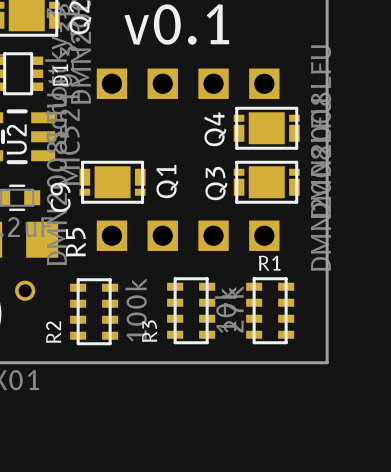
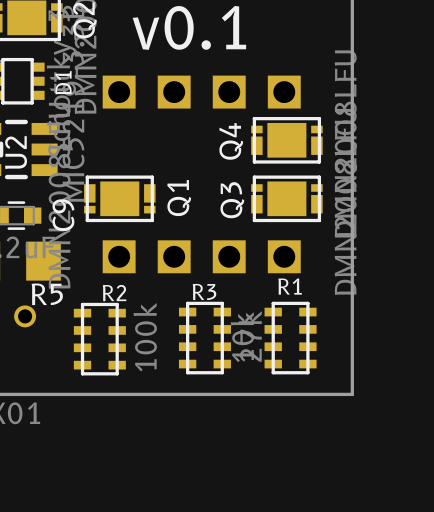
R5 name rotation: 0° (75, 242) -> 90° clockwise (47, 294)
R3 name rotation: 0° (149, 331) -> 90° clockwise (204, 291)
R3 name position: R3 (149, 331) -> R3 (204, 291)
R2 name rotation: 0° (53, 332) -> 90° clockwise (114, 293)
R2 name position: R2 (53, 332) -> R2 (114, 293)

